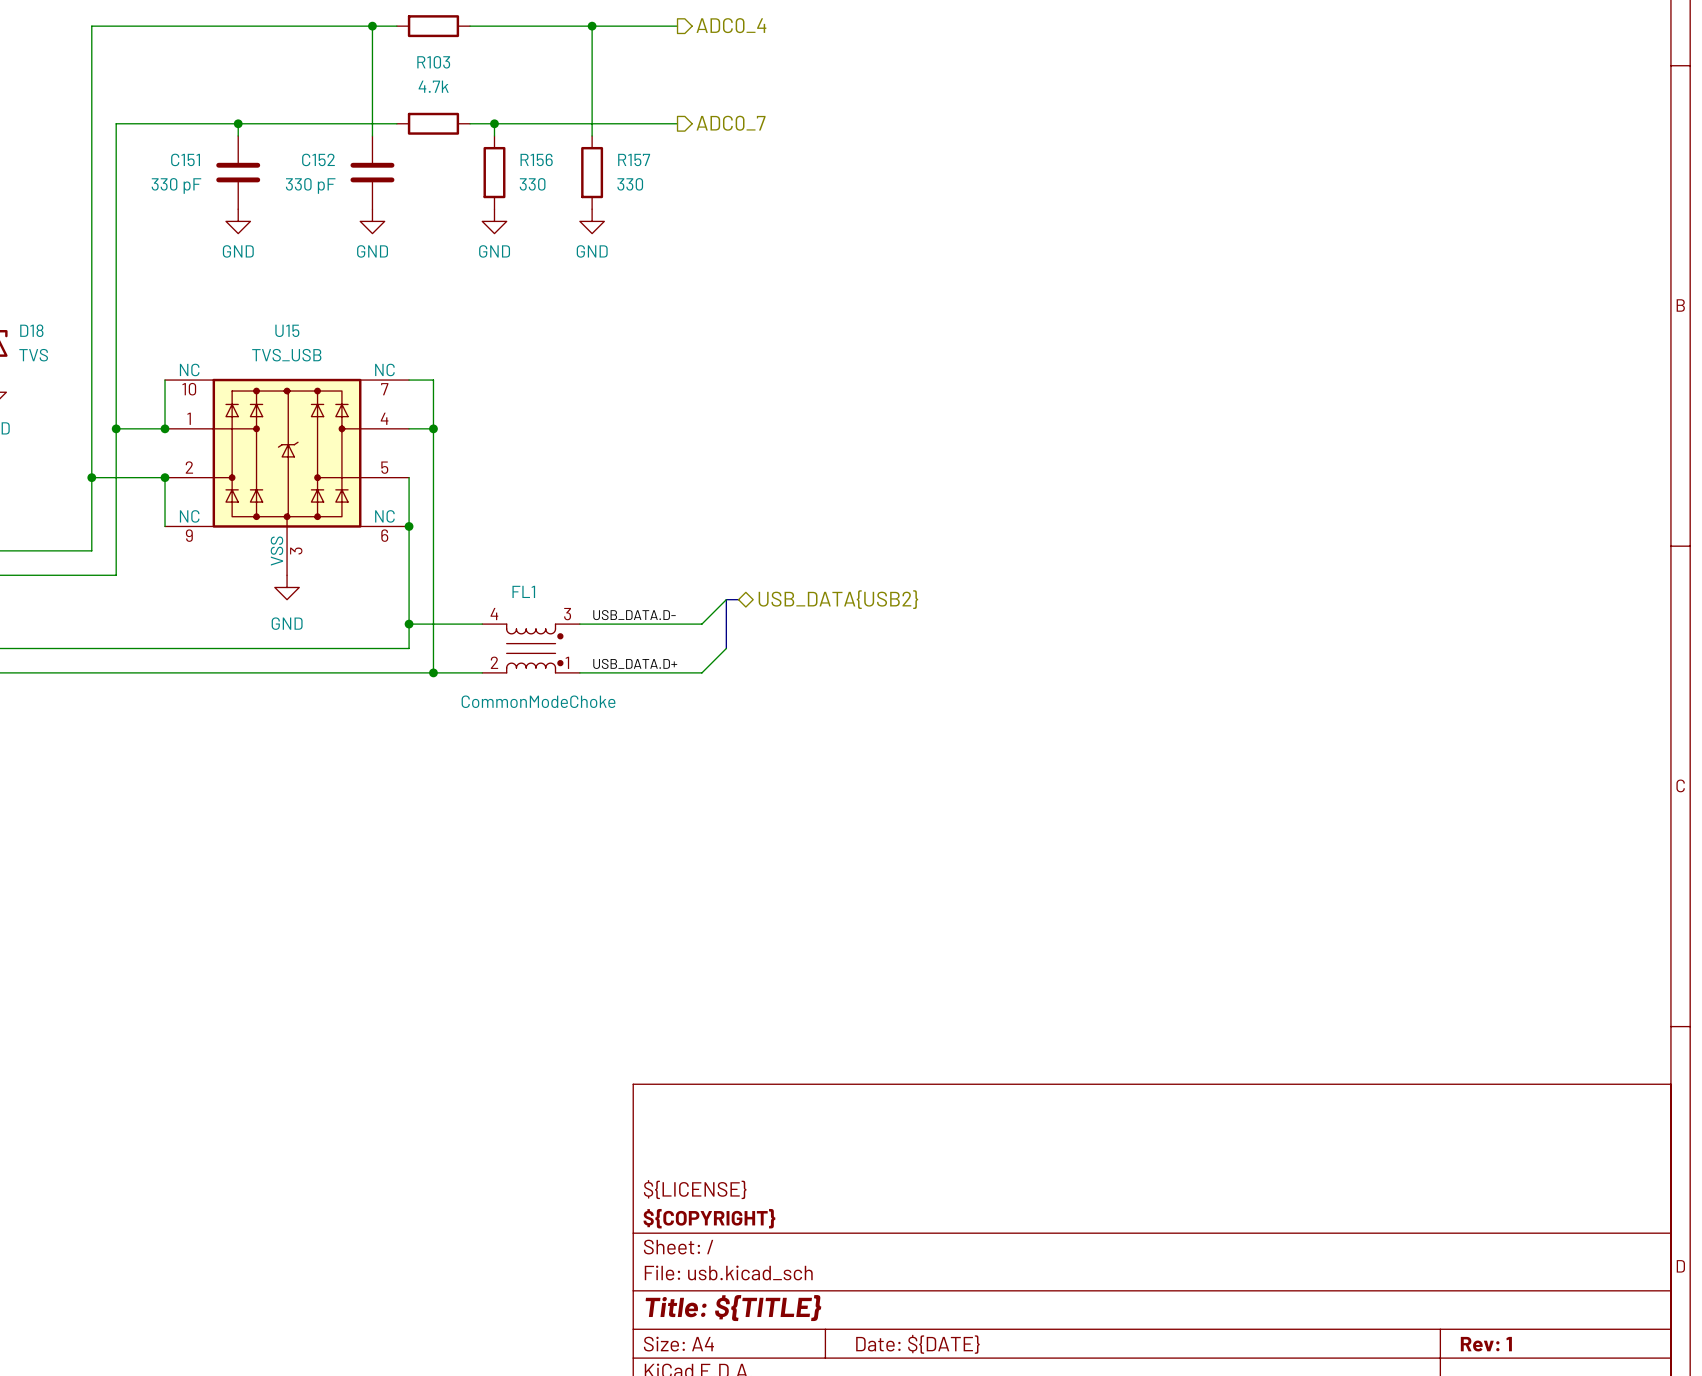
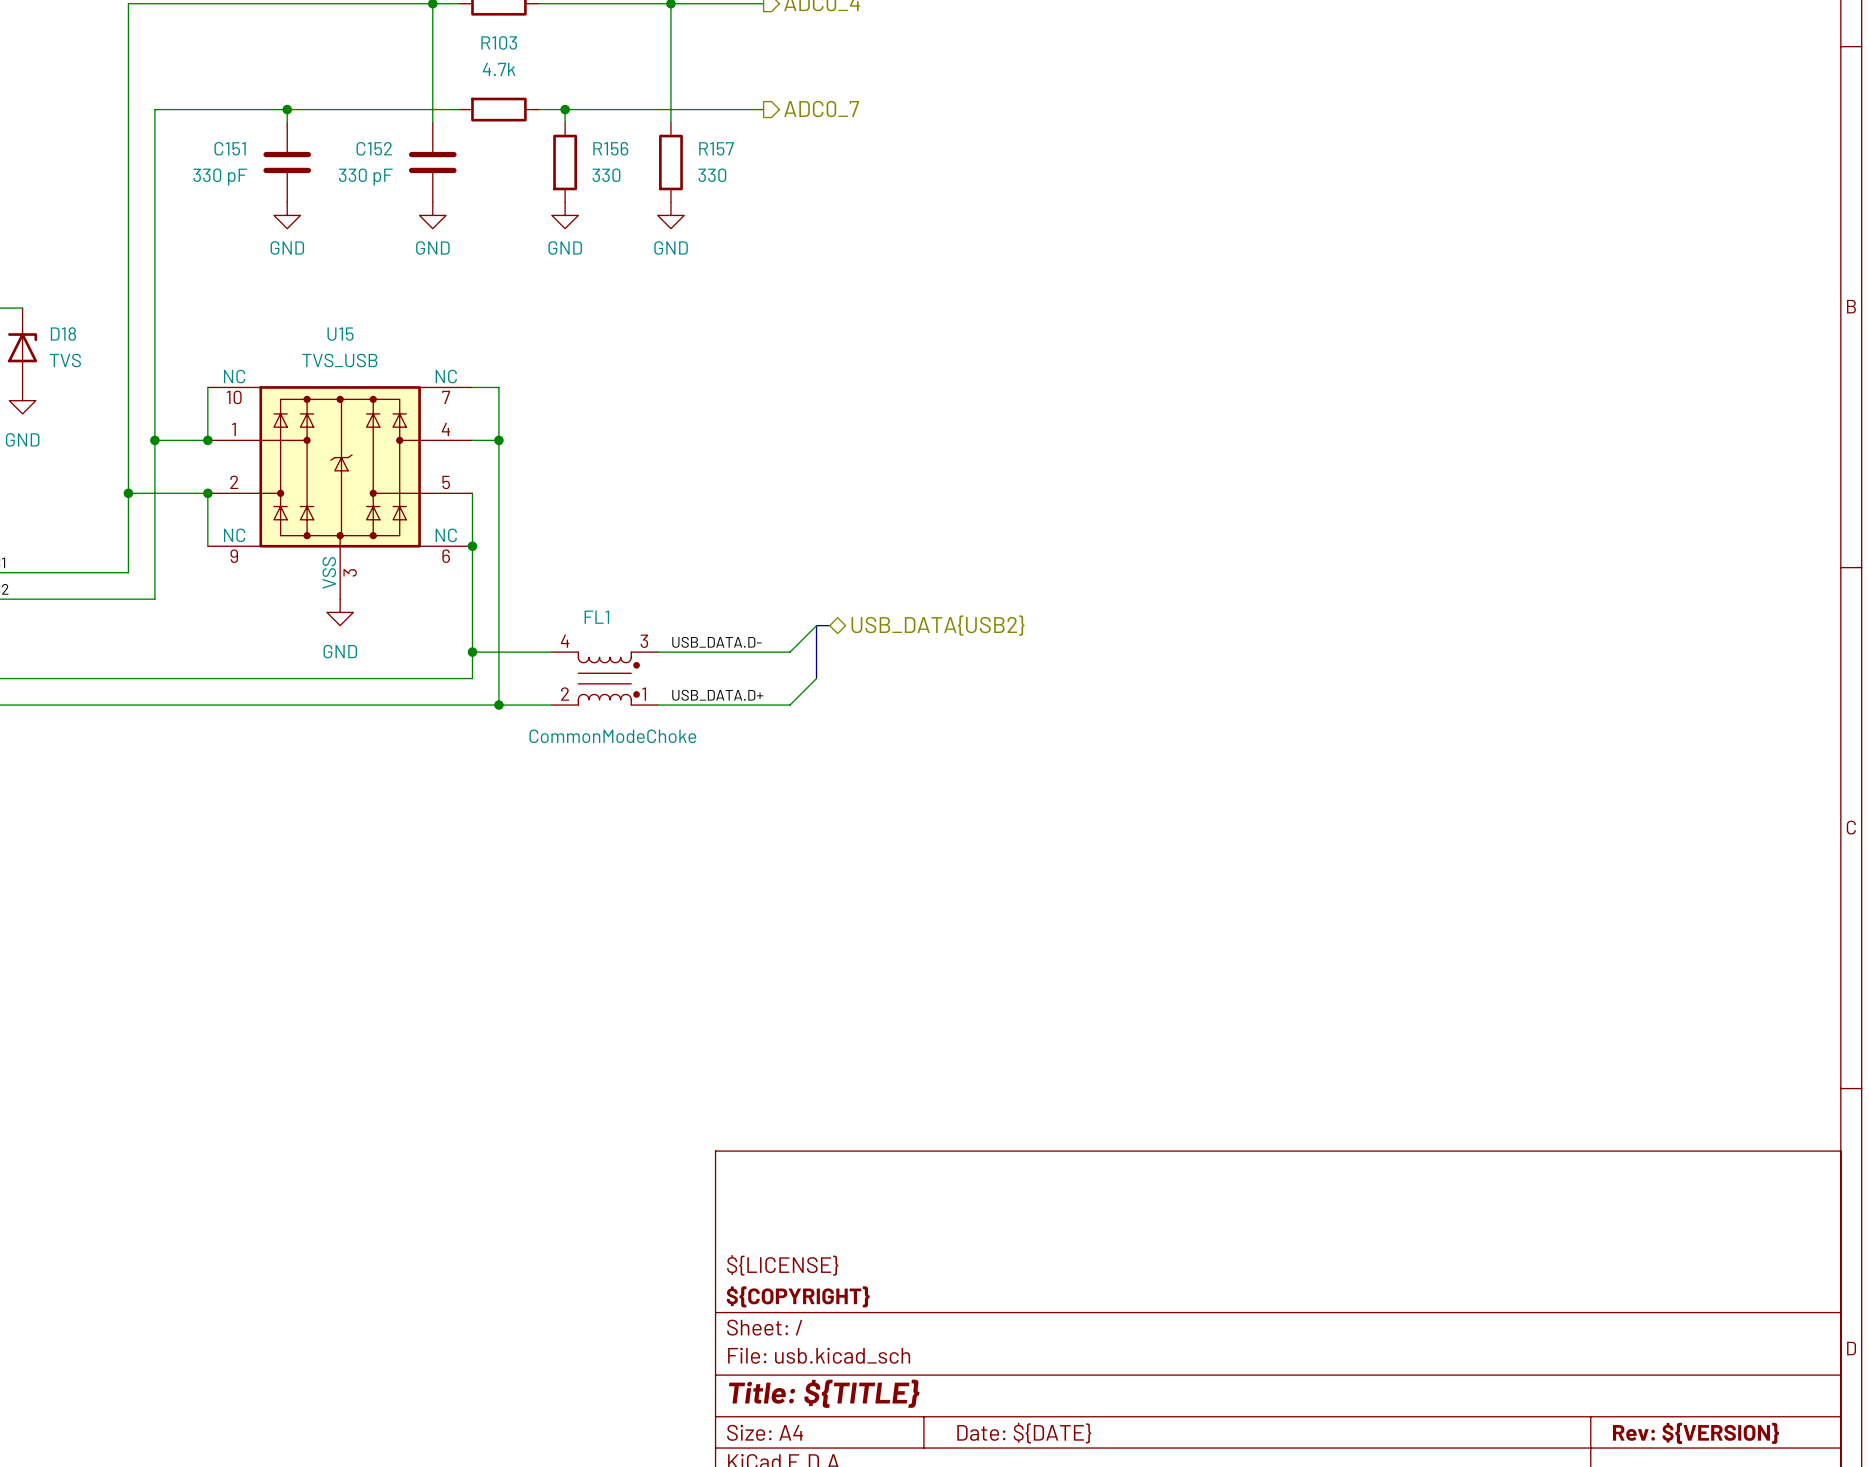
title block: Rev: 1 (1486, 1344) -> Rev: ${VERSION} (1695, 1433)

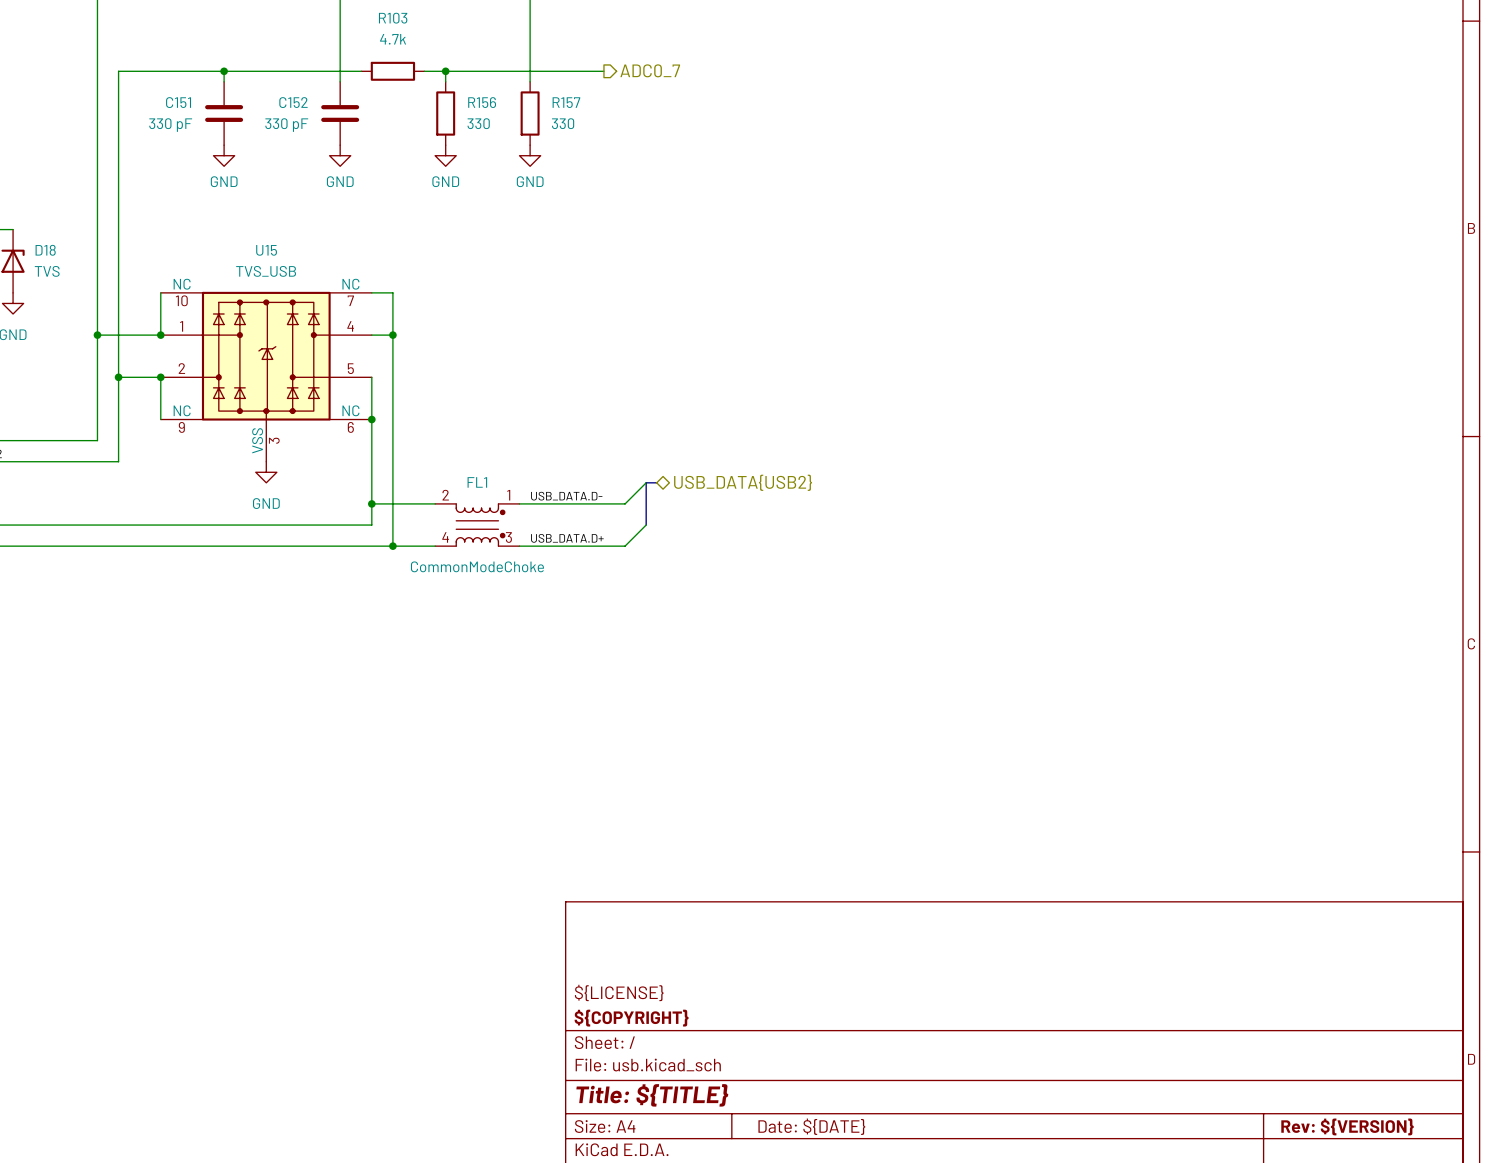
junction: none -> (97, 335)
junction: (154, 440) -> none
wire: (128, 493) (154, 493) -> (97, 335) (118, 335)
junction: (128, 493) -> none
junction: none -> (118, 377)
FL1 flip: as is (608, 678) -> up-down (480, 525)

